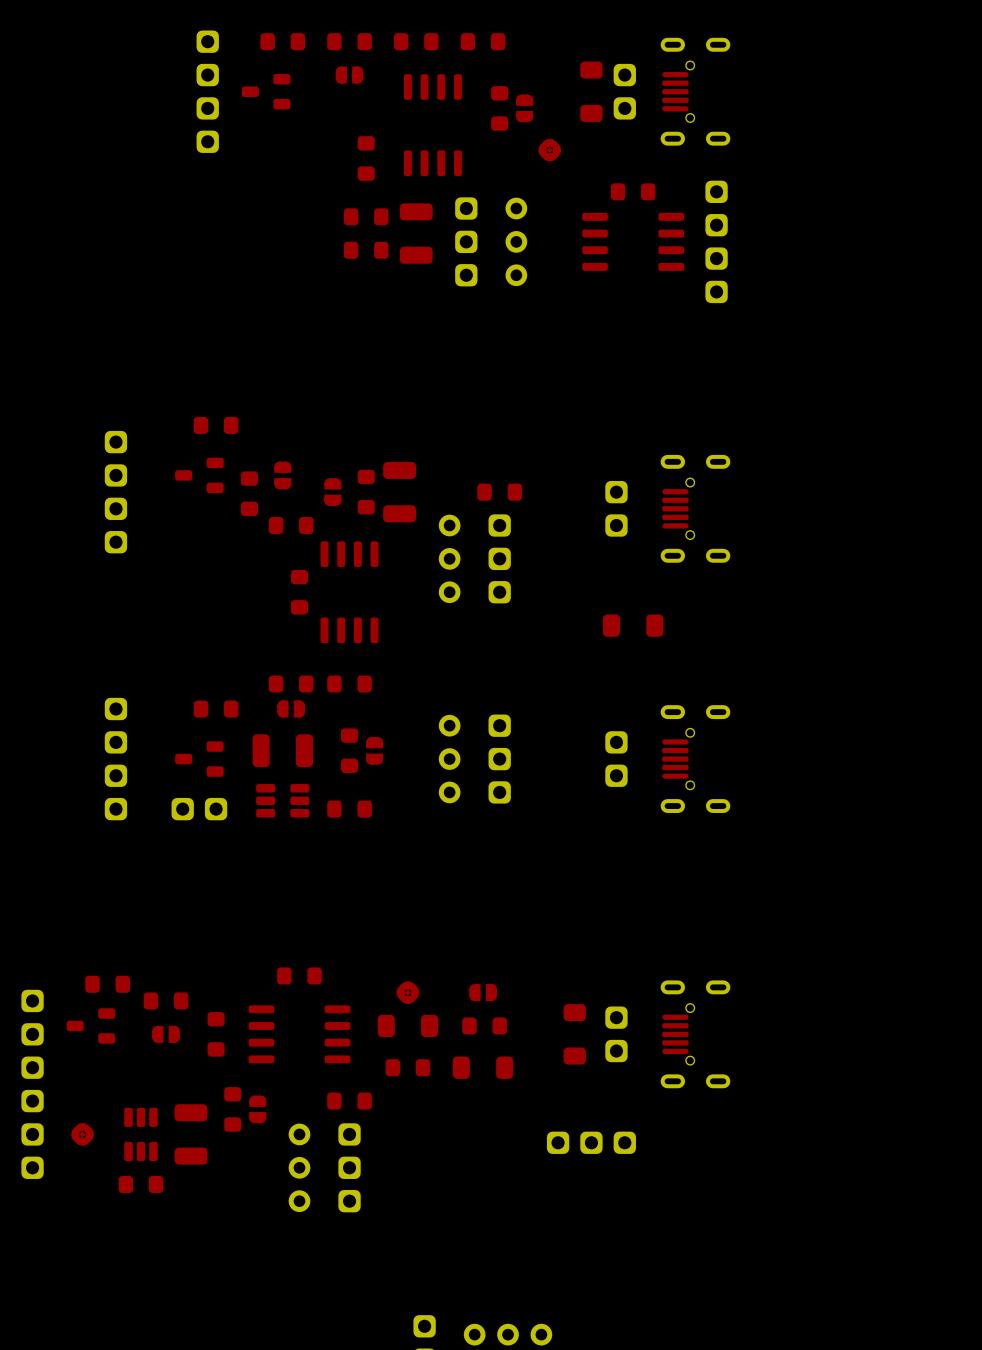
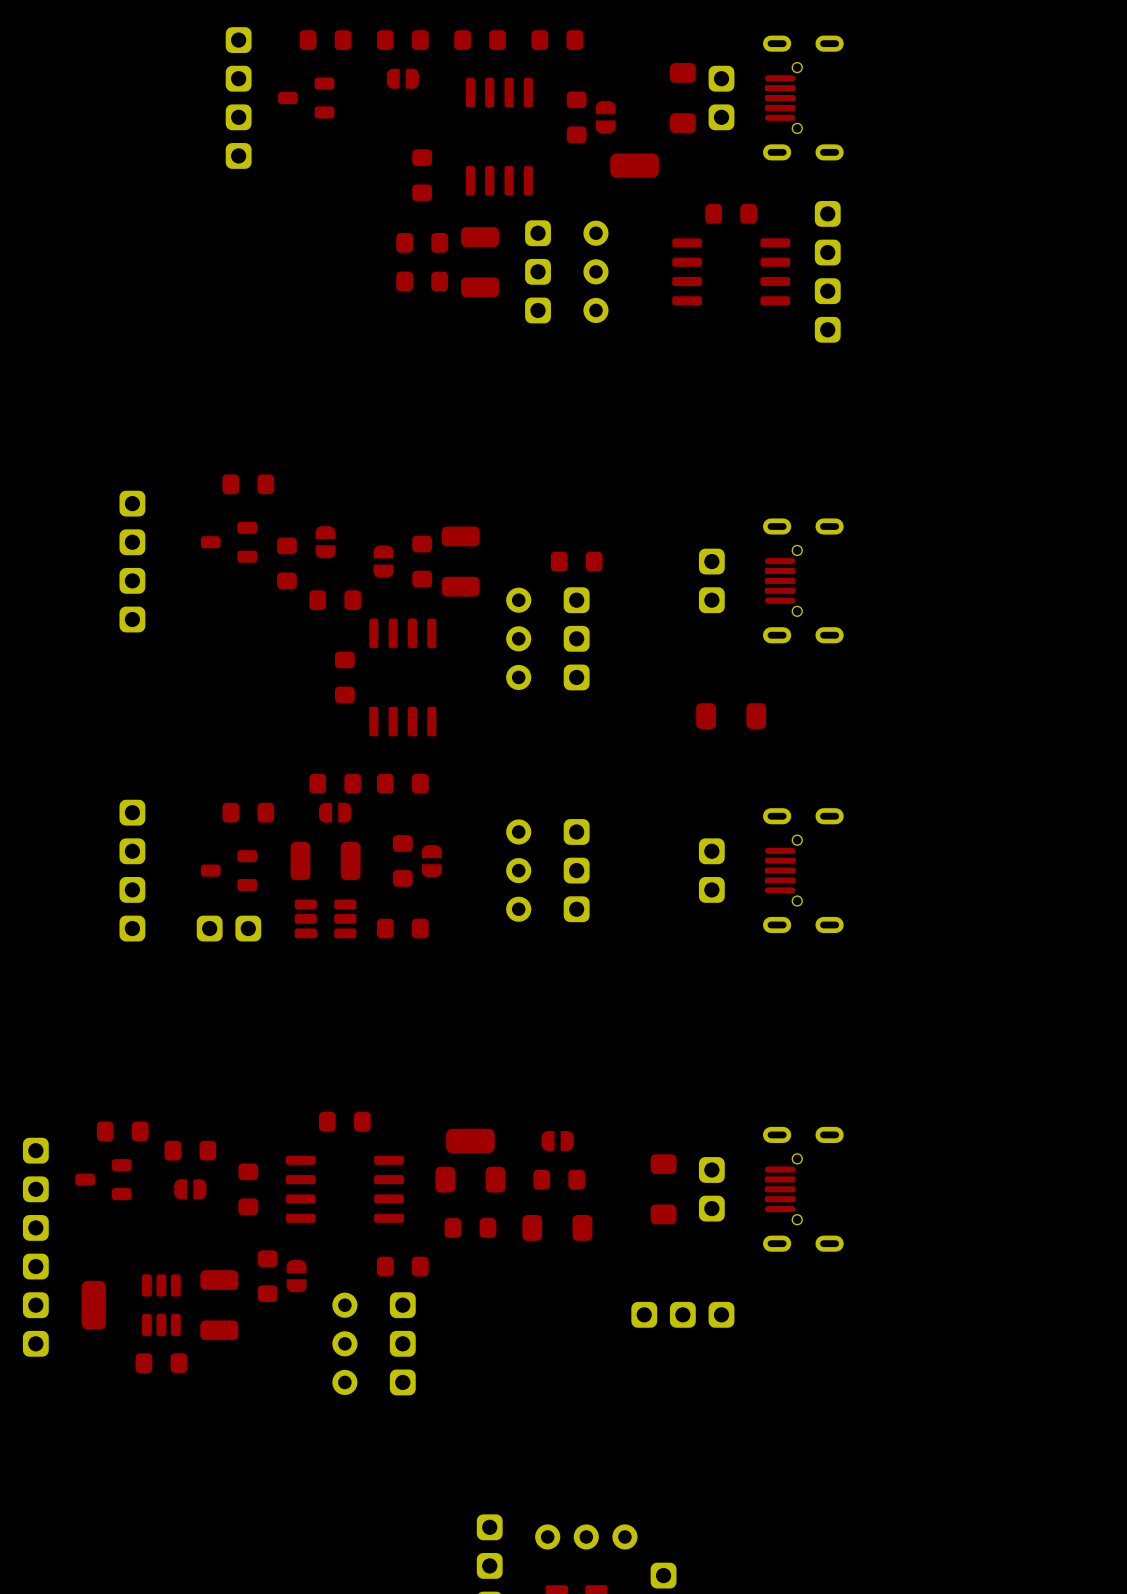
part footprint: [538, 138, 562, 162] -> [610, 153, 659, 178]
part footprint: [396, 981, 420, 1005] -> [446, 1128, 495, 1154]
part footprint: [71, 1123, 94, 1146] -> [81, 1280, 106, 1330]

